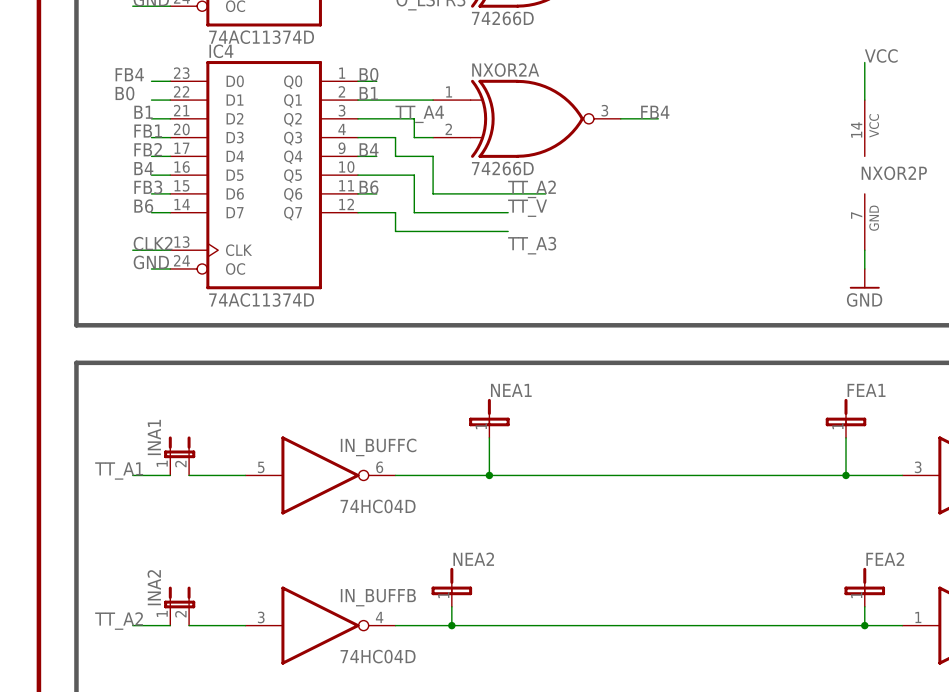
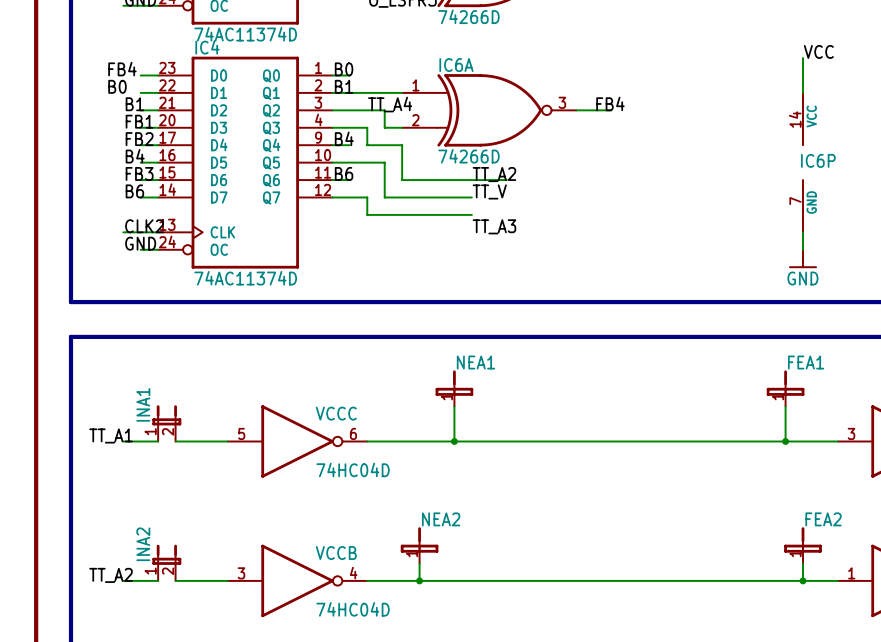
NXOR2A name: NXOR2A (505, 70) -> IC6A (456, 65)
NXOR2P name: NXOR2P (894, 173) -> IC6P (818, 160)
IN_BUFFC name: IN_BUFFC (378, 447) -> VCCC (336, 413)
IN_BUFFB name: IN_BUFFB (378, 597) -> VCCB (336, 553)

